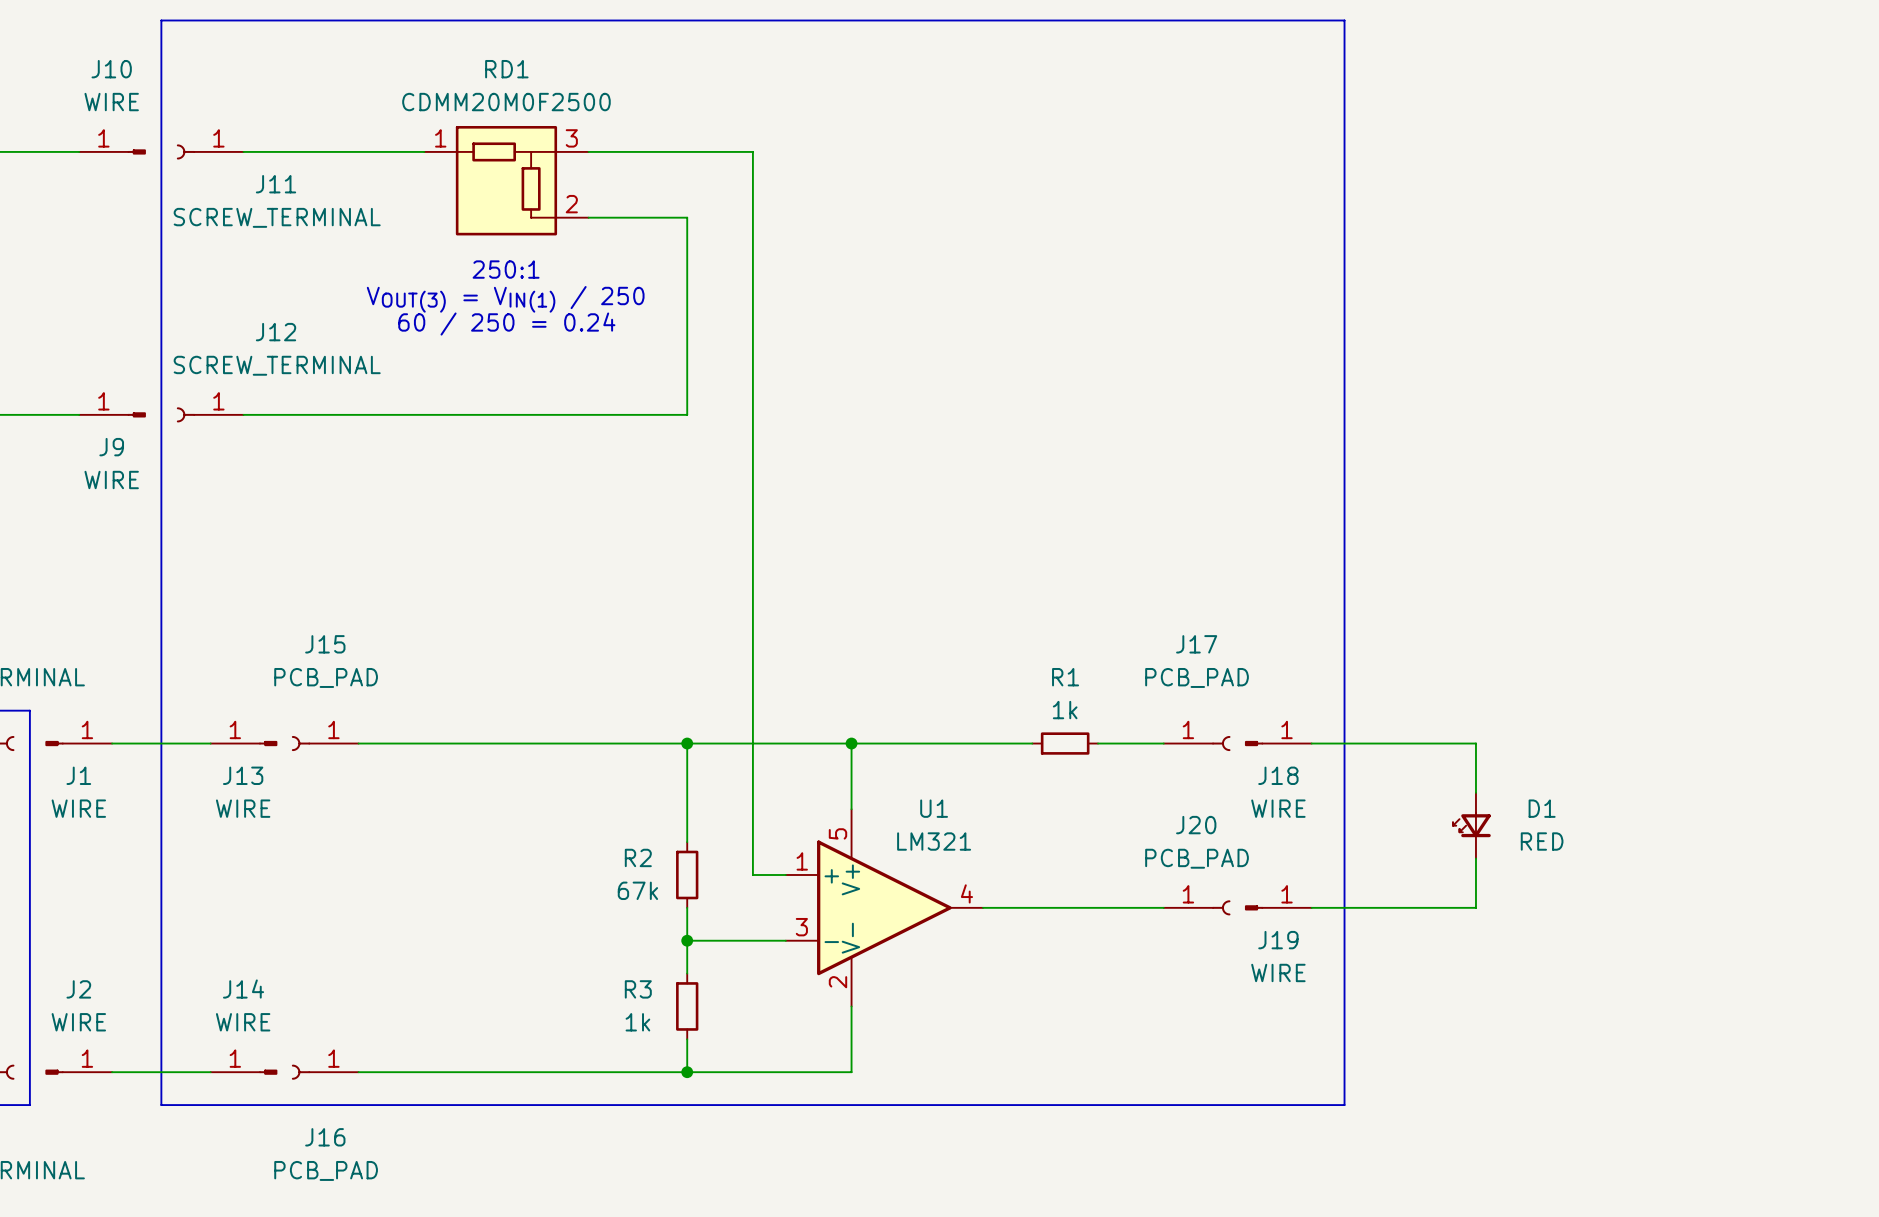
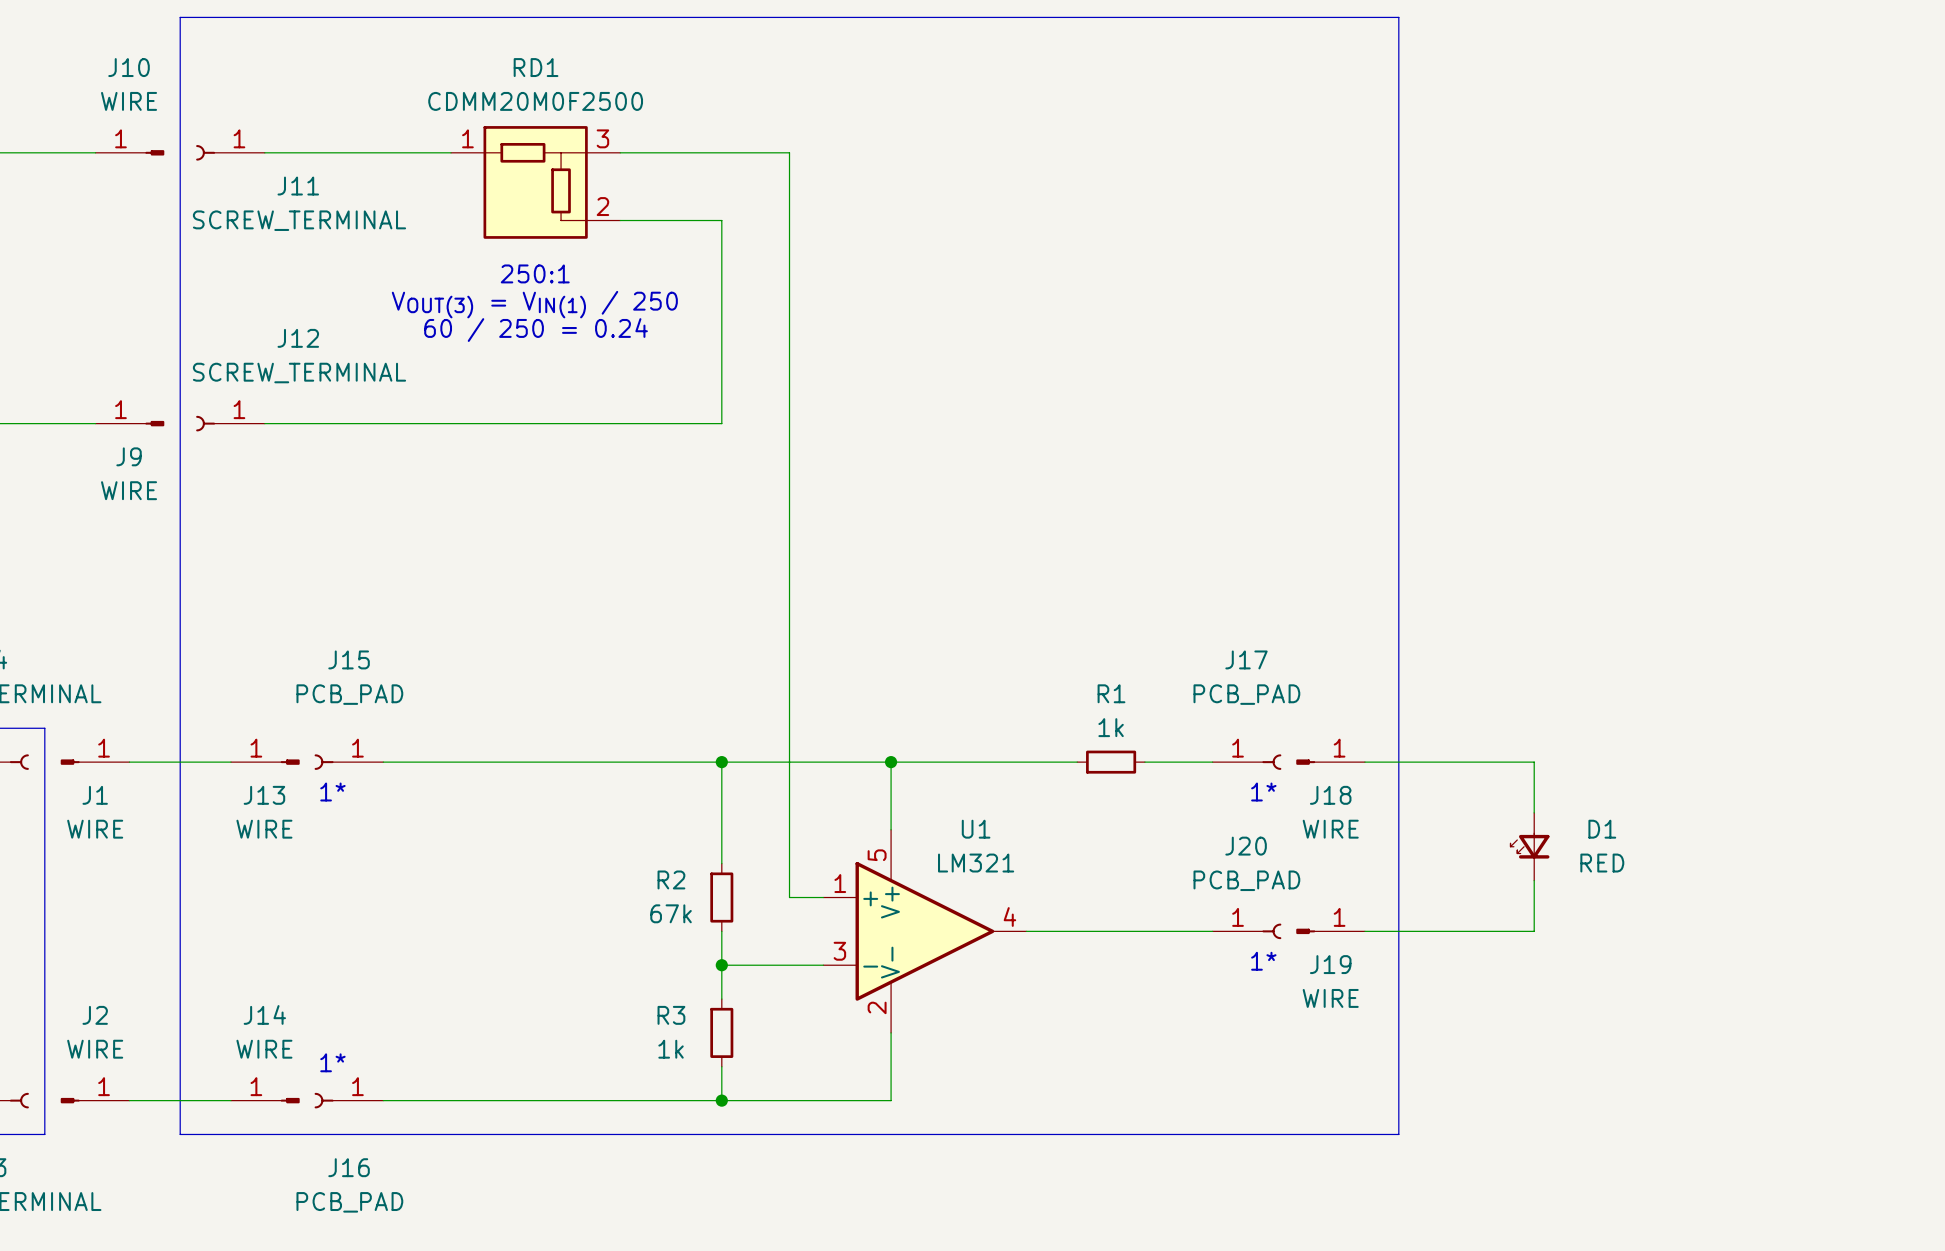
text: none -> 1* (332, 792)
text: none -> 1* (1263, 792)
text: none -> 1* (1263, 961)
text: none -> 1* (332, 1062)

